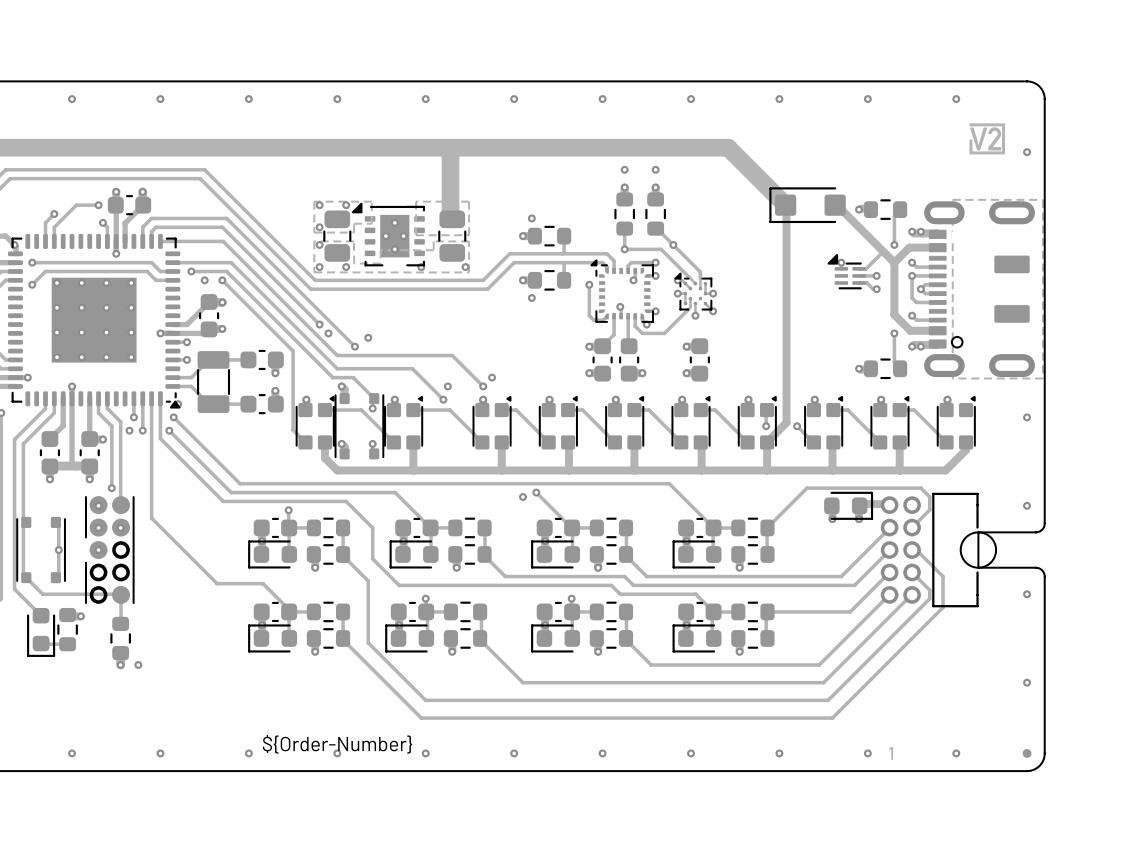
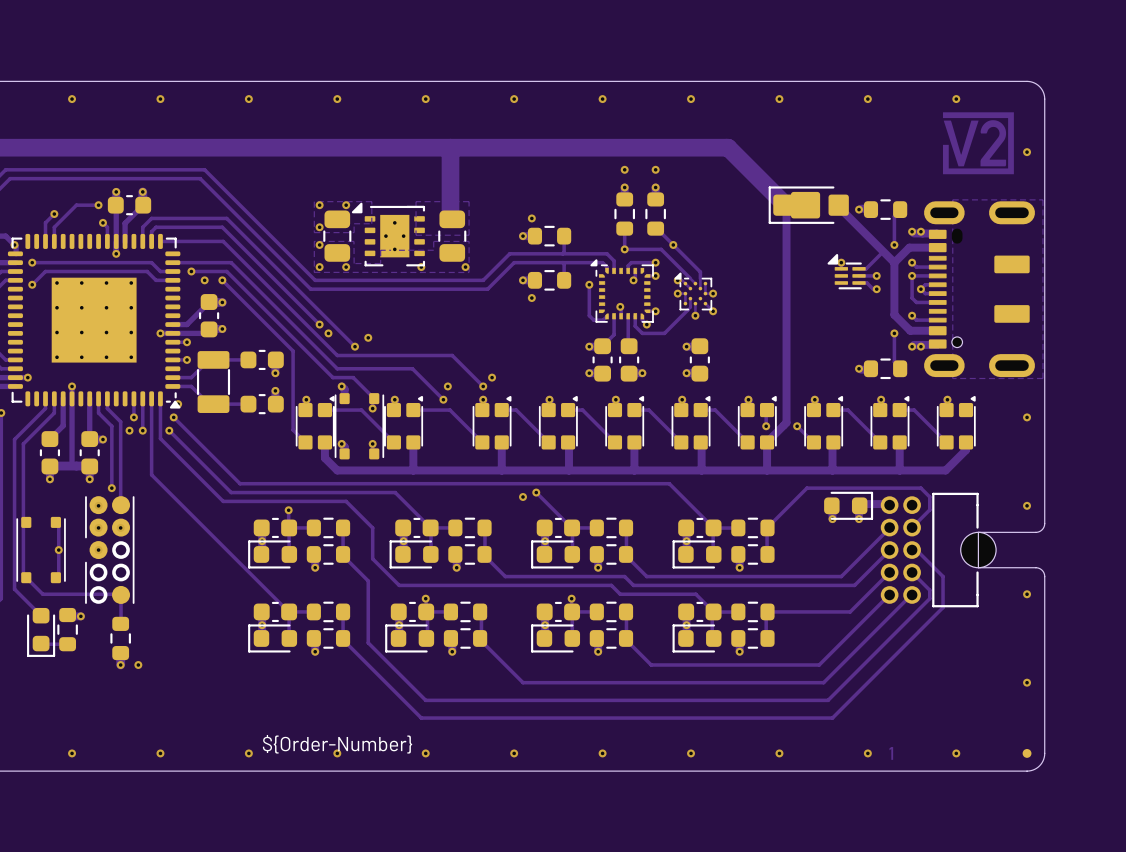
drawing shape: [969, 123, 1006, 155] -> [942, 112, 1014, 175]
part footprint: [769, 187, 846, 224] -> [768, 186, 849, 224]
track: (151, 474) (151, 518) (217, 583) (263, 583) (289, 611) -> (151, 474) (289, 611)

